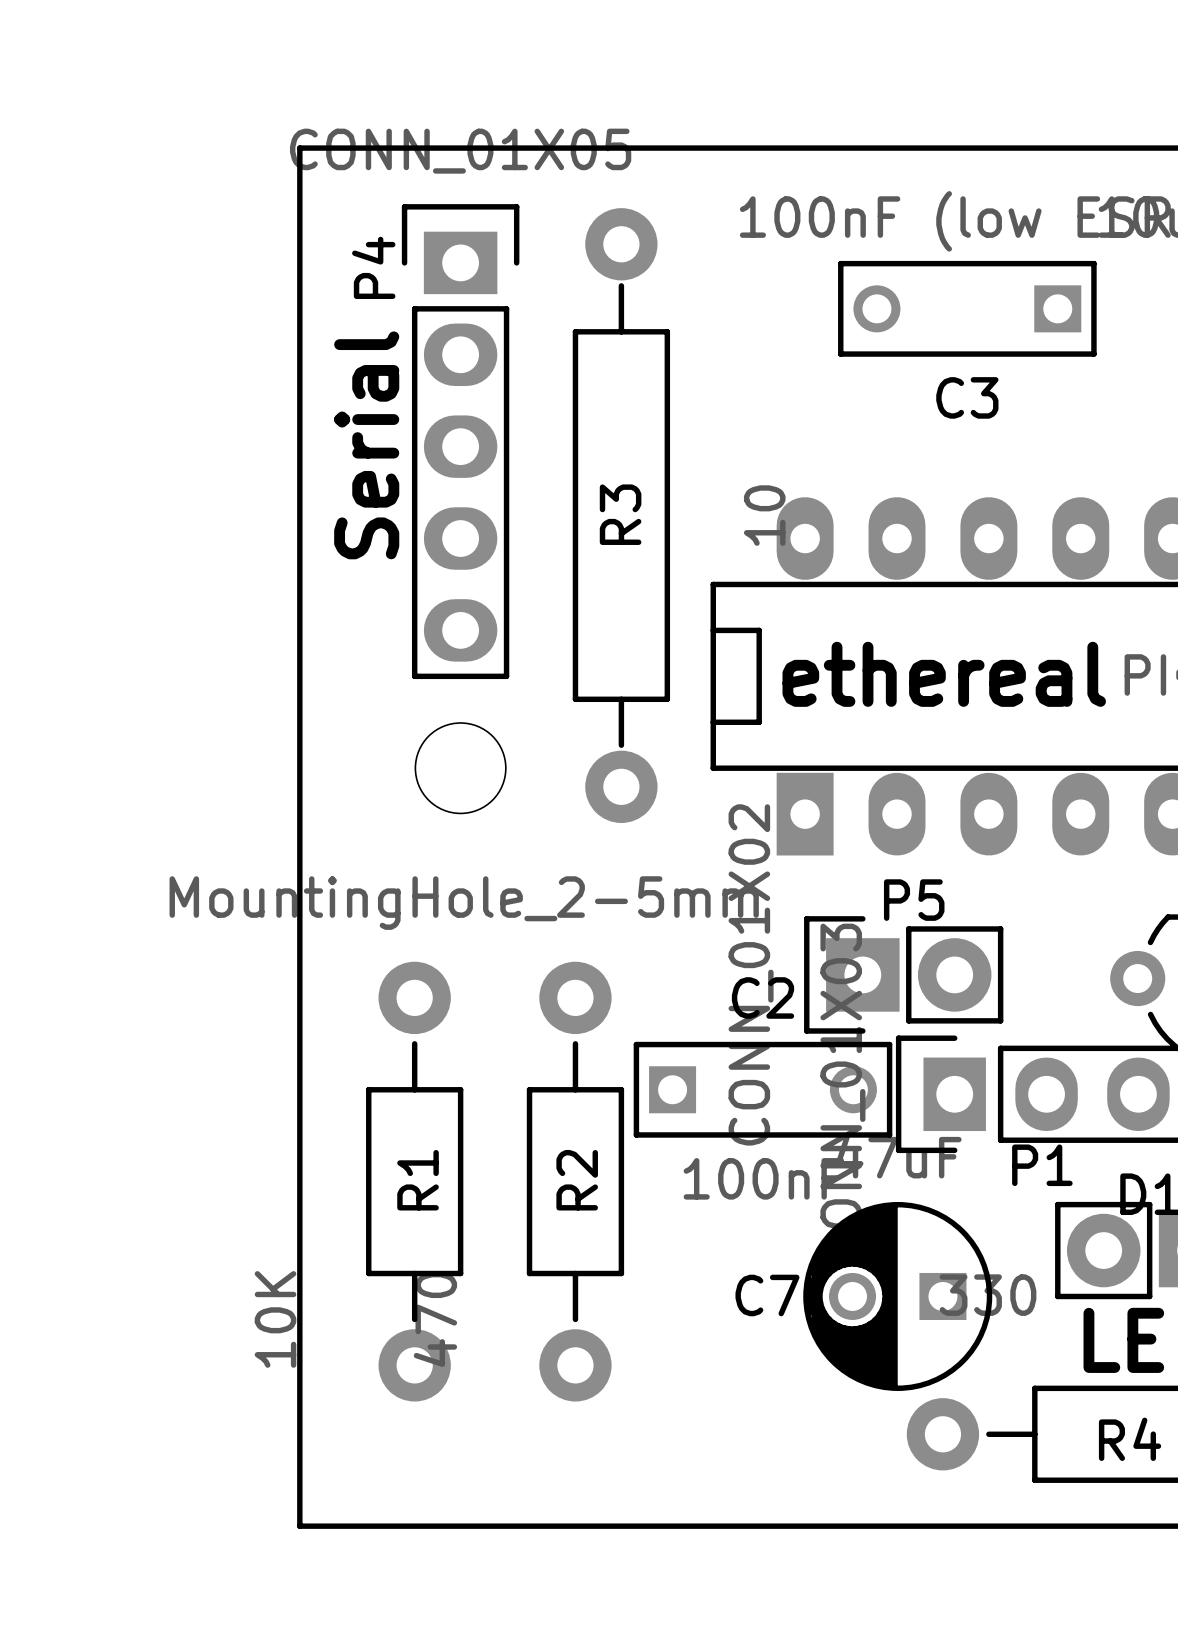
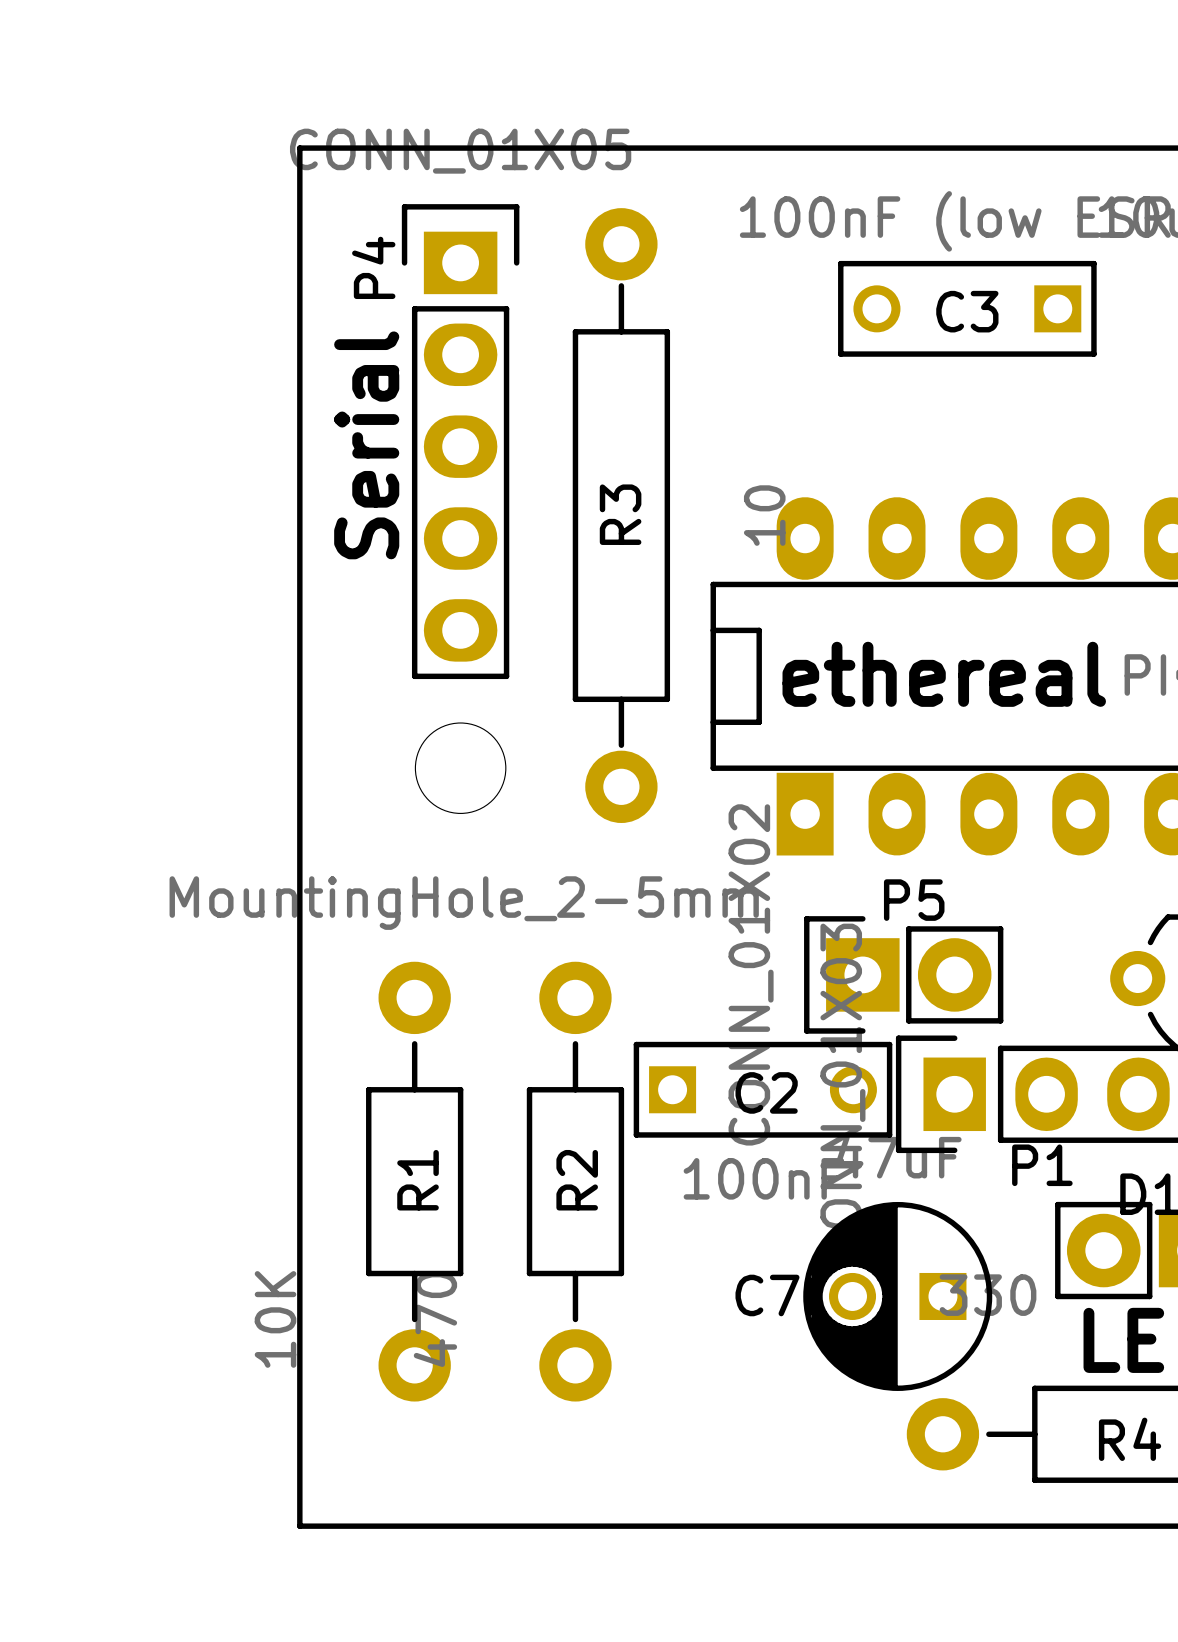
C3 name position: C3 (967, 397) -> C3 (967, 311)
C2 name position: C2 (763, 997) -> C2 (766, 1092)

